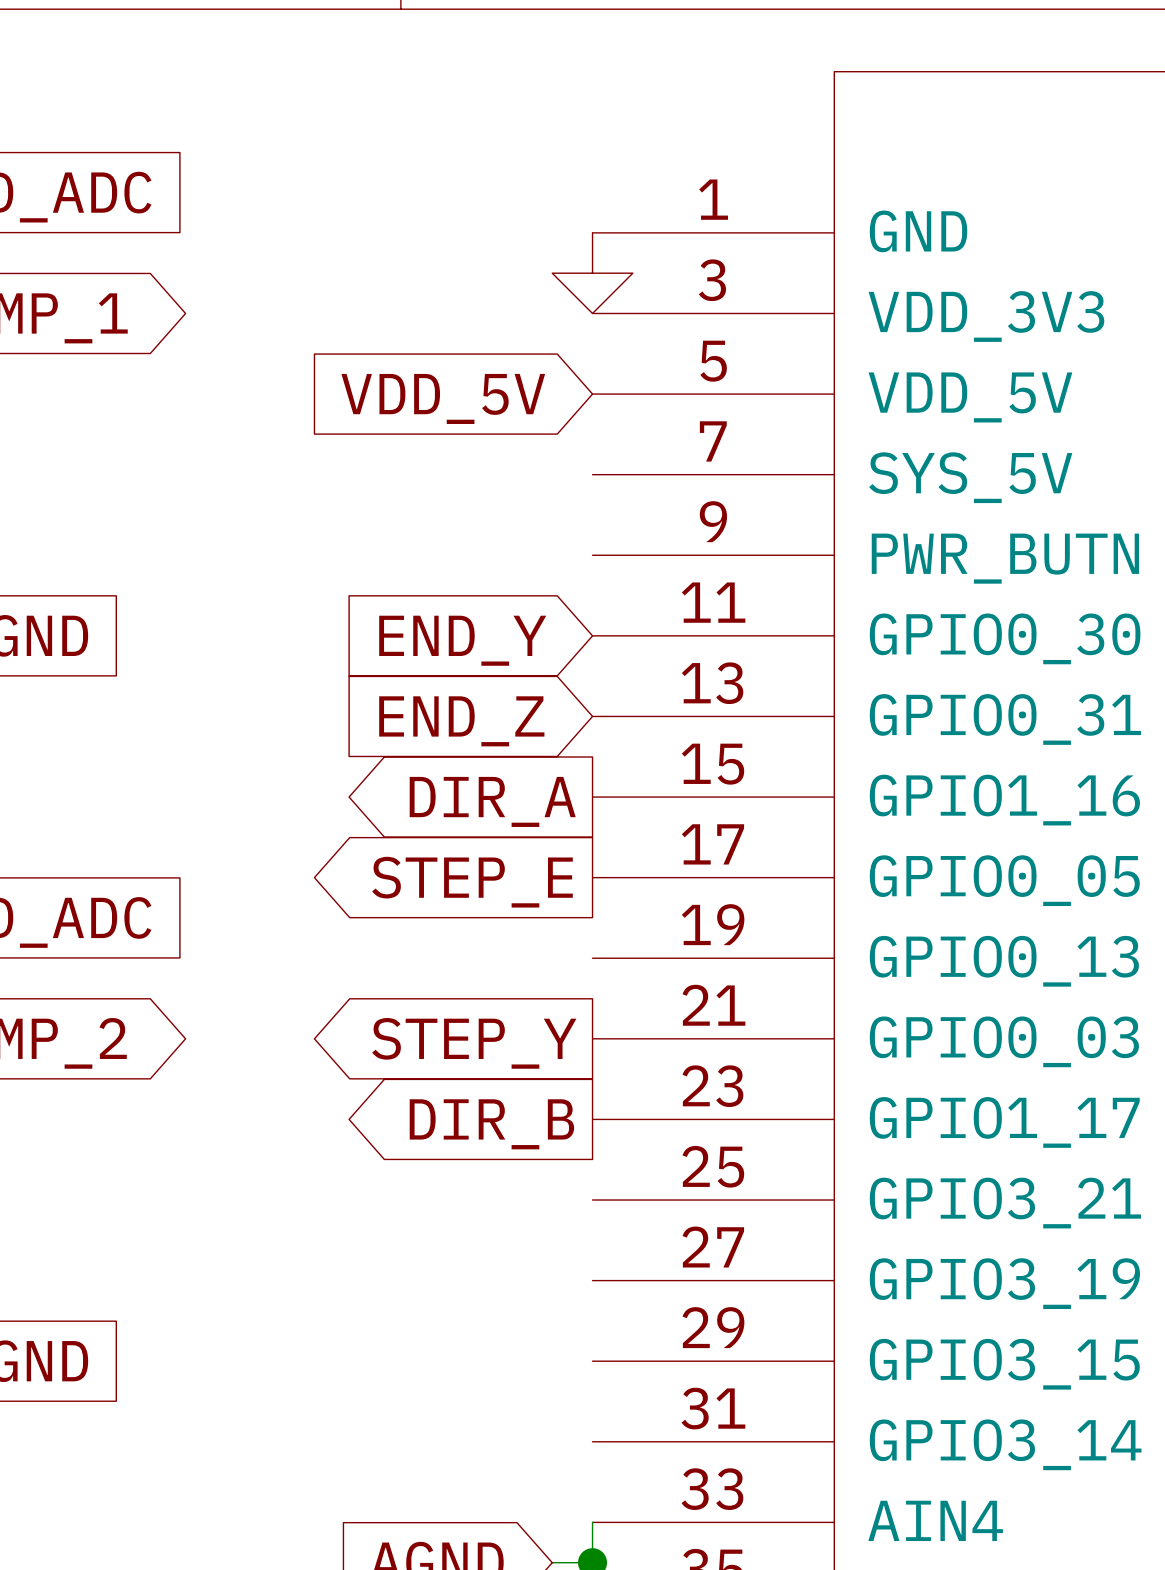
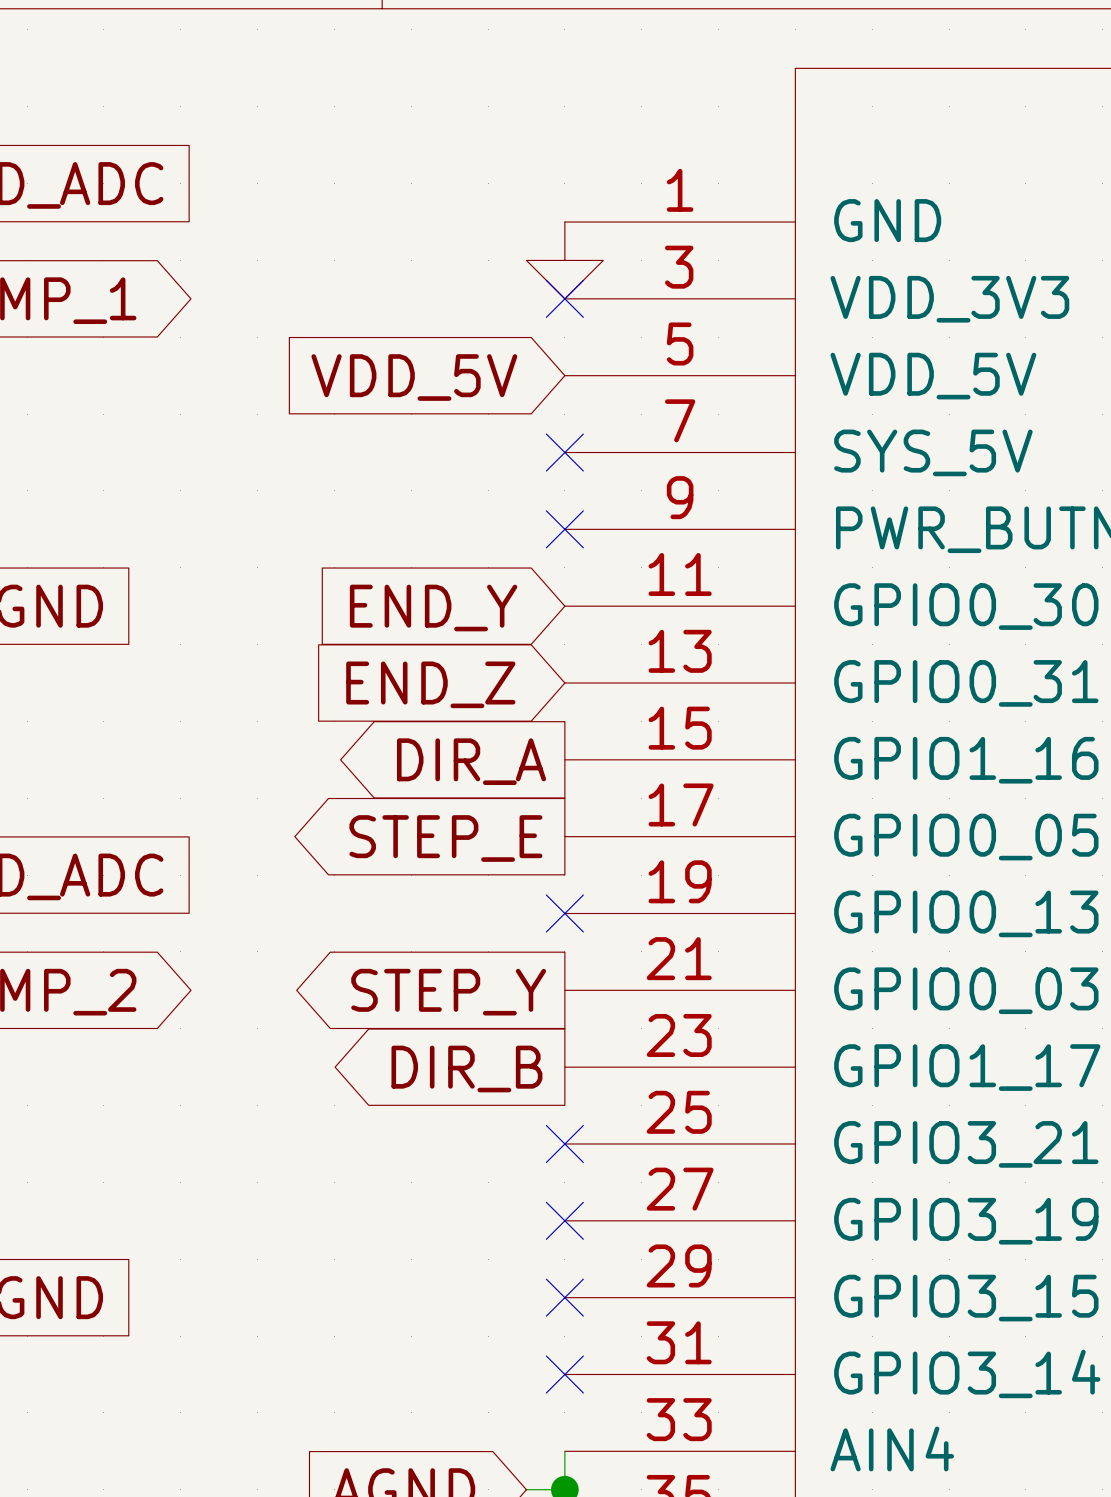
no-connect mark: none -> (564, 298)
no-connect mark: none -> (564, 452)
no-connect mark: none -> (564, 529)
no-connect mark: none -> (564, 913)
no-connect mark: none -> (564, 1143)
no-connect mark: none -> (564, 1220)
no-connect mark: none -> (564, 1297)
no-connect mark: none -> (564, 1374)

